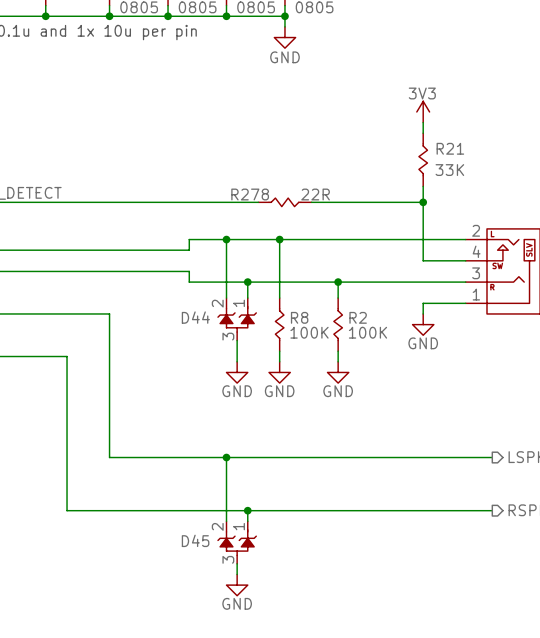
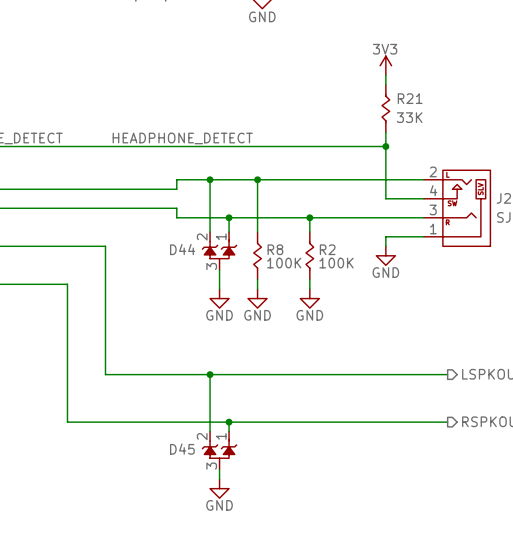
label: none -> HEADPHONE_DETECT (182, 138)
R278: 22R (284, 202) -> none

